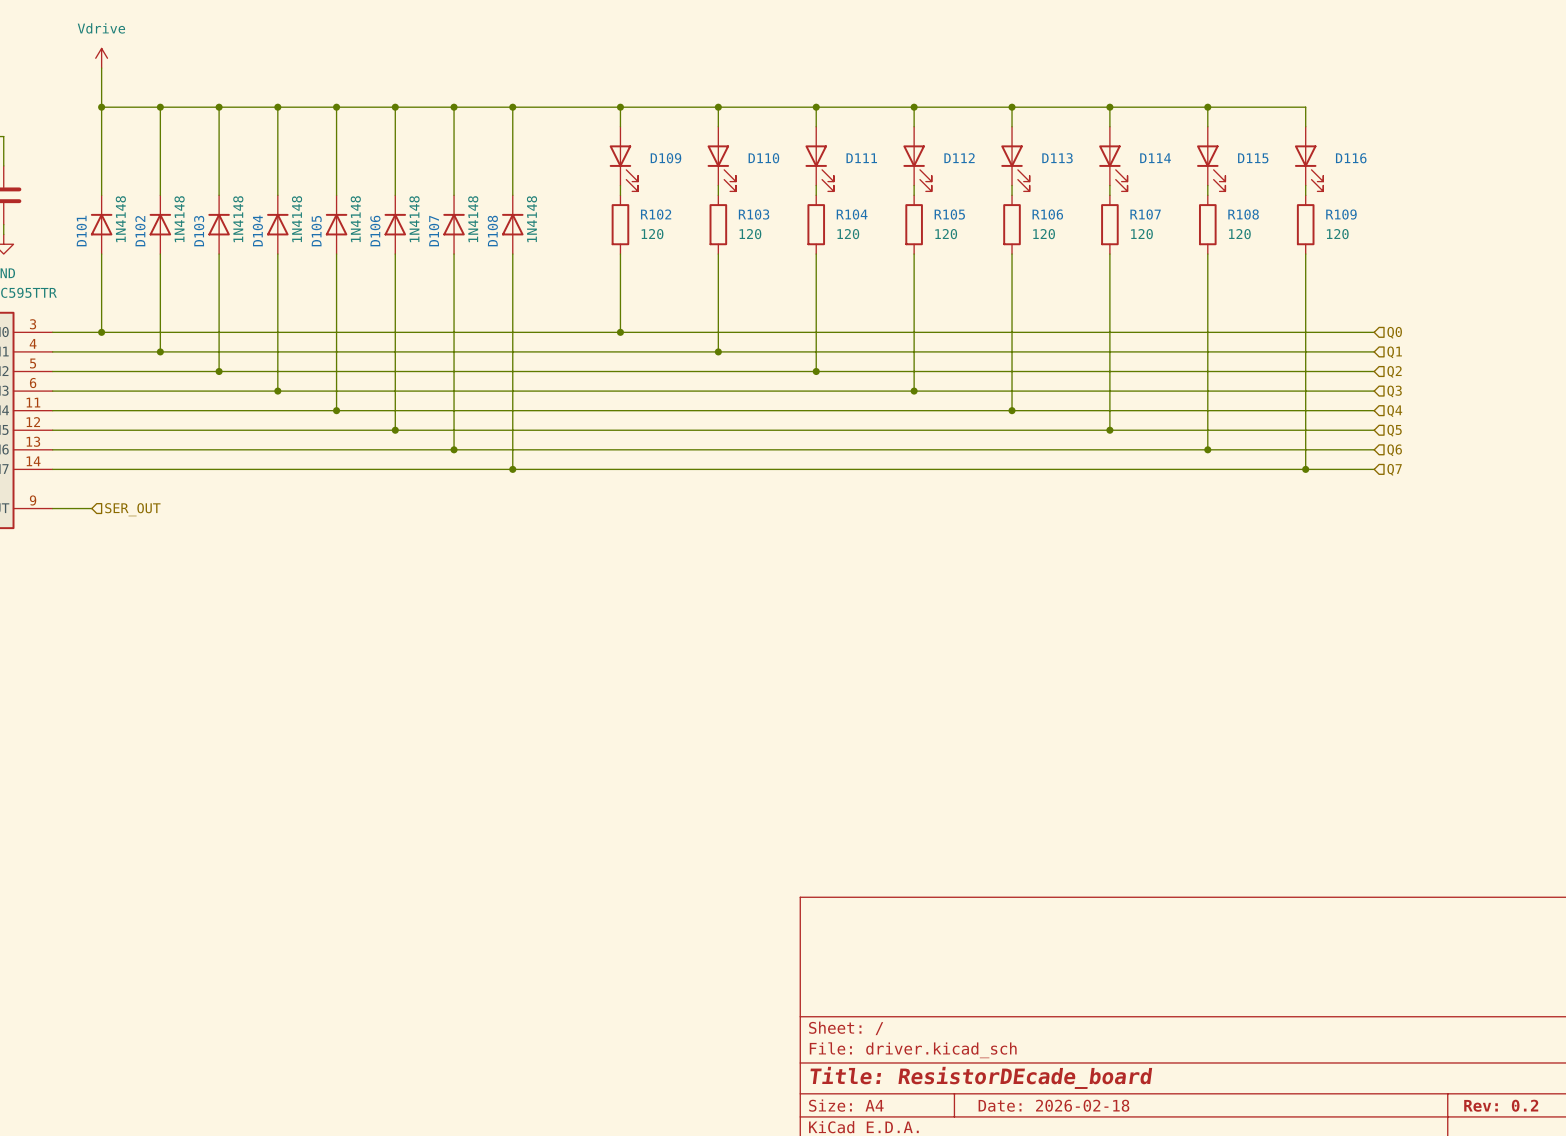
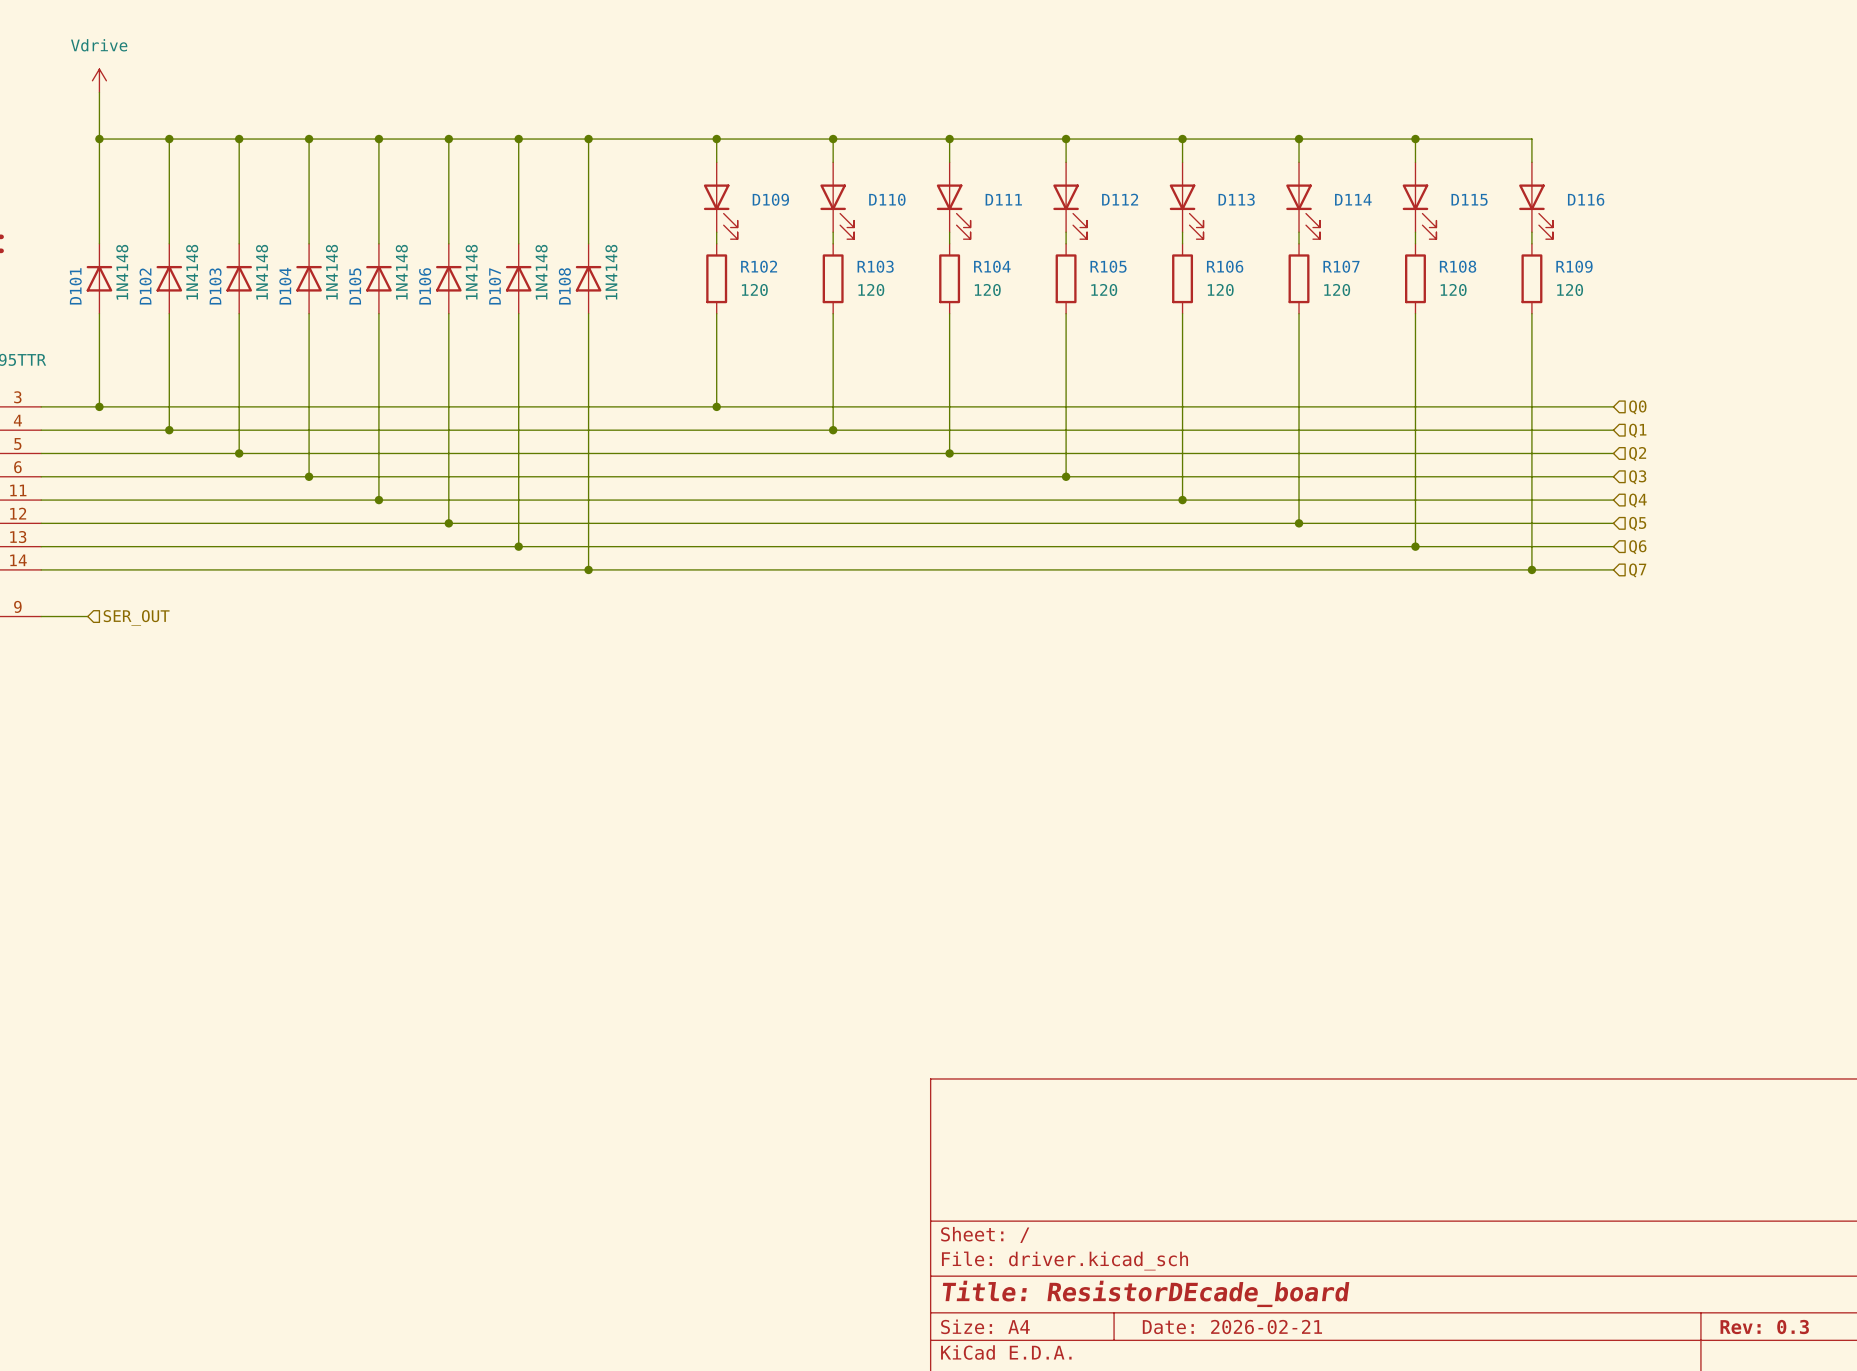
title block: Date: 2026-02-18 (1053, 1105) -> Date: 2026-02-21 (1232, 1327)
title block: Rev: 0.2 (1501, 1105) -> Rev: 0.3 (1764, 1327)

